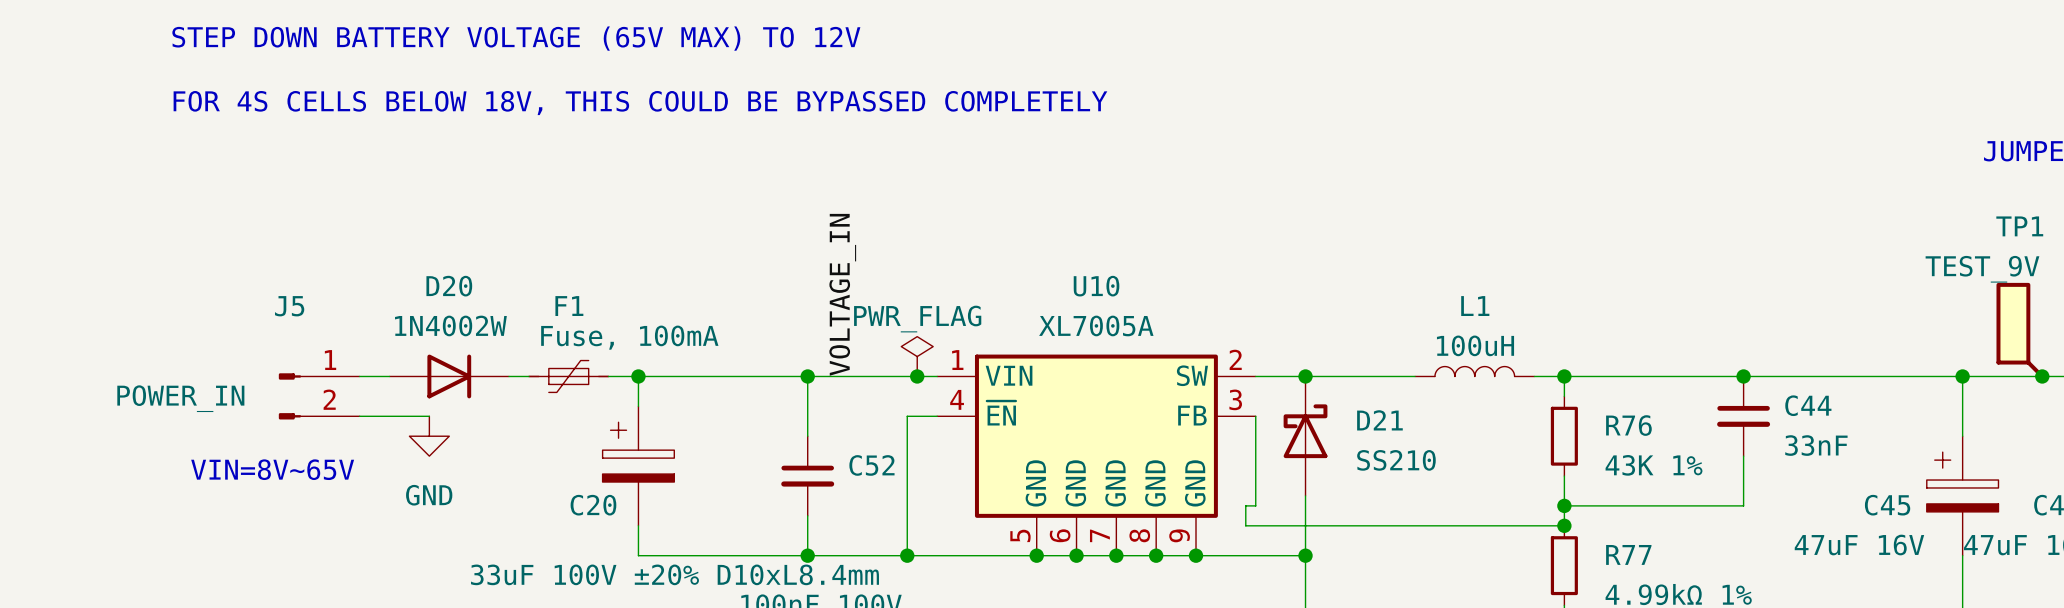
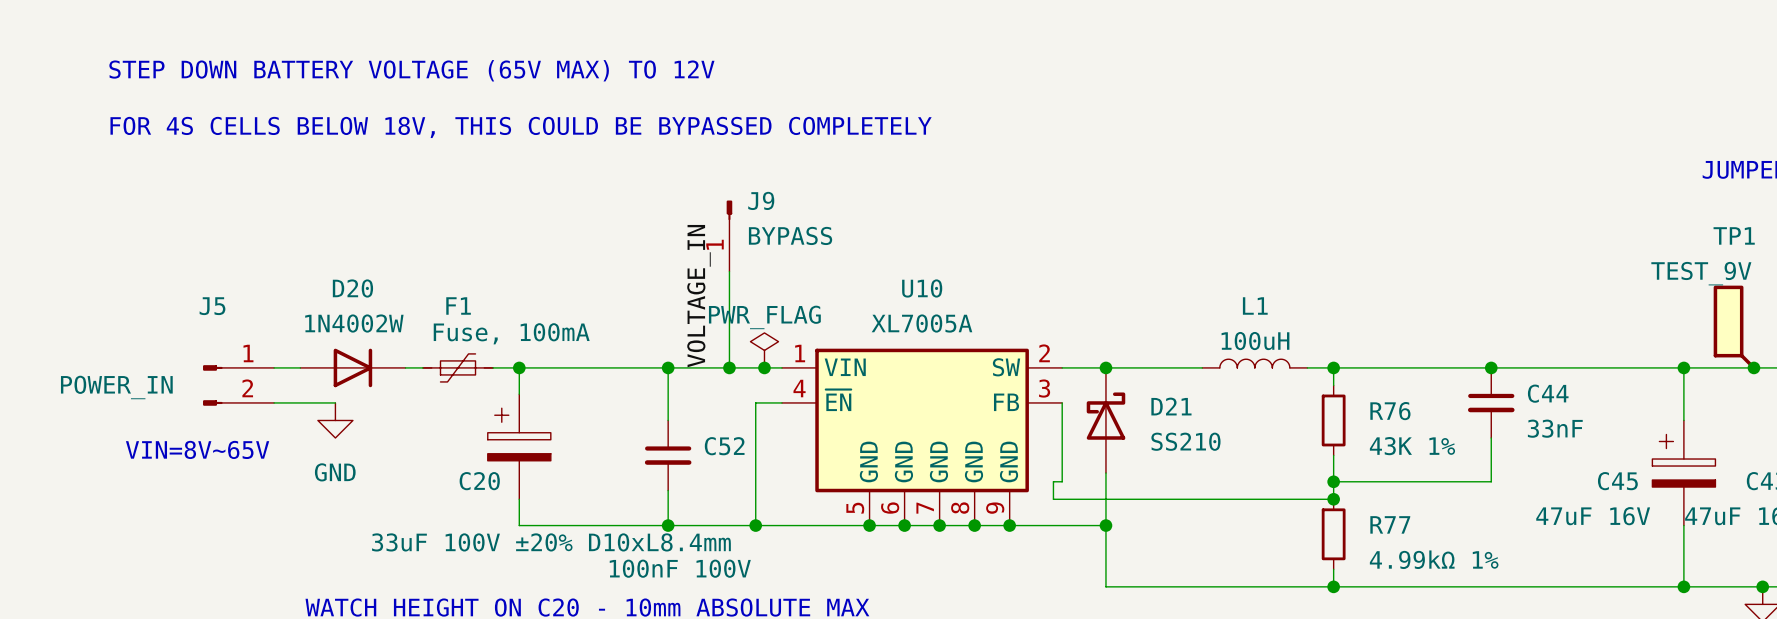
J9: none -> BYPASS (729, 236)
wire: none -> (729, 271) (729, 367)
junction: none -> (729, 367)

